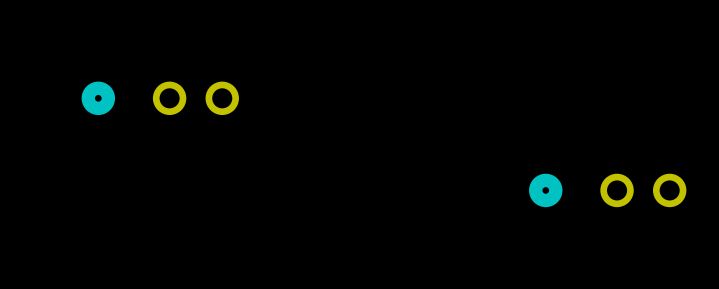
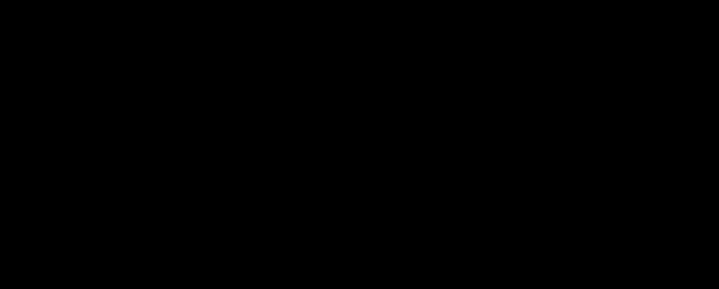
part: (160, 98) -> none
part: (607, 190) -> none

